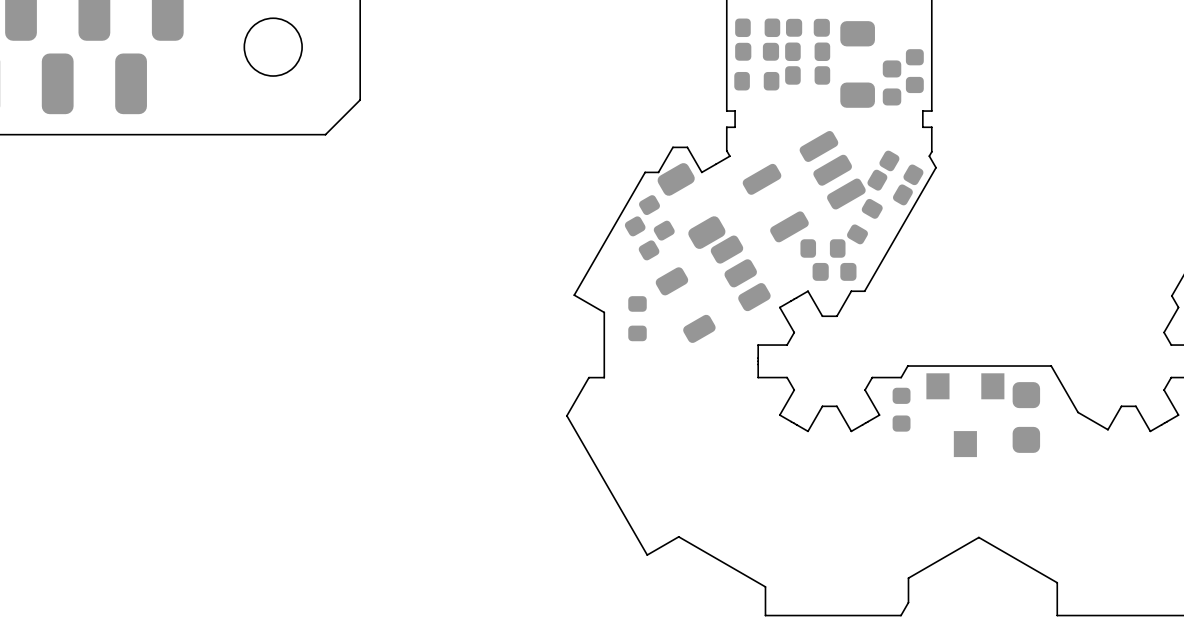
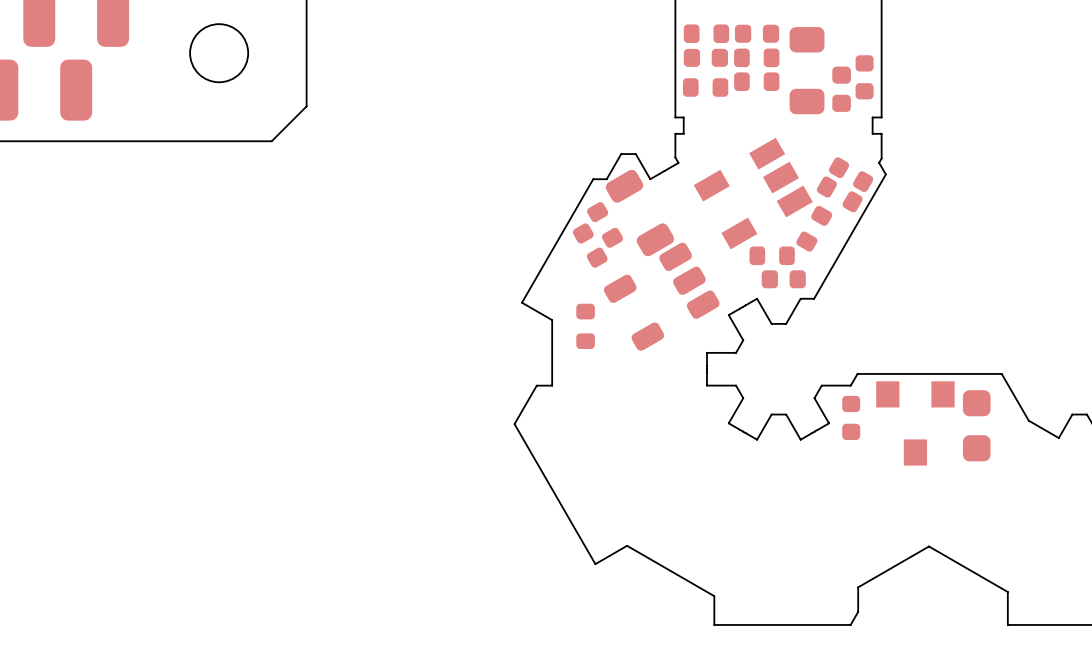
part footprint: [742, 130, 866, 243] -> [693, 137, 813, 250]

